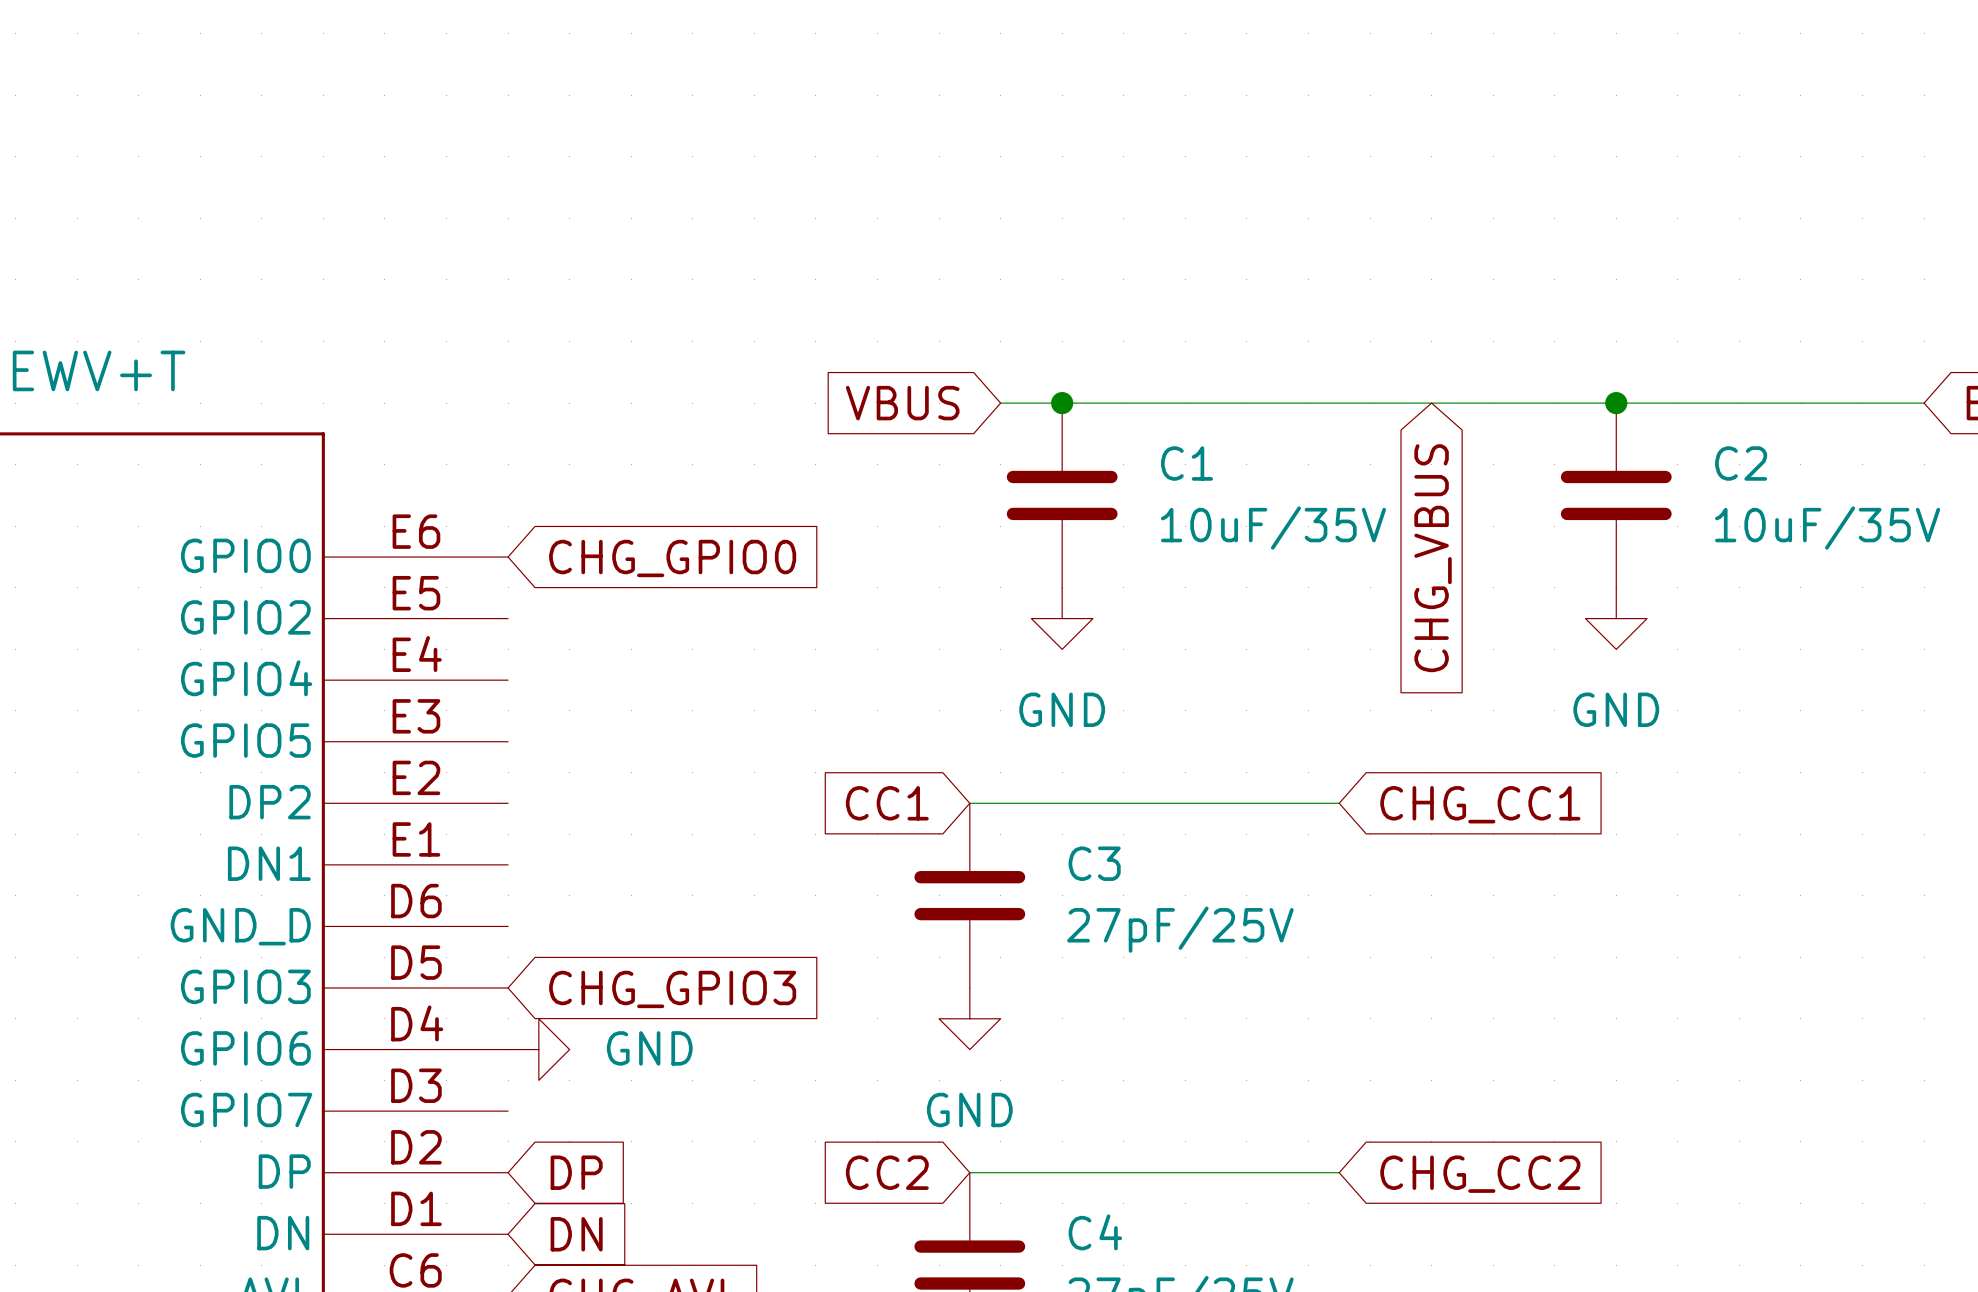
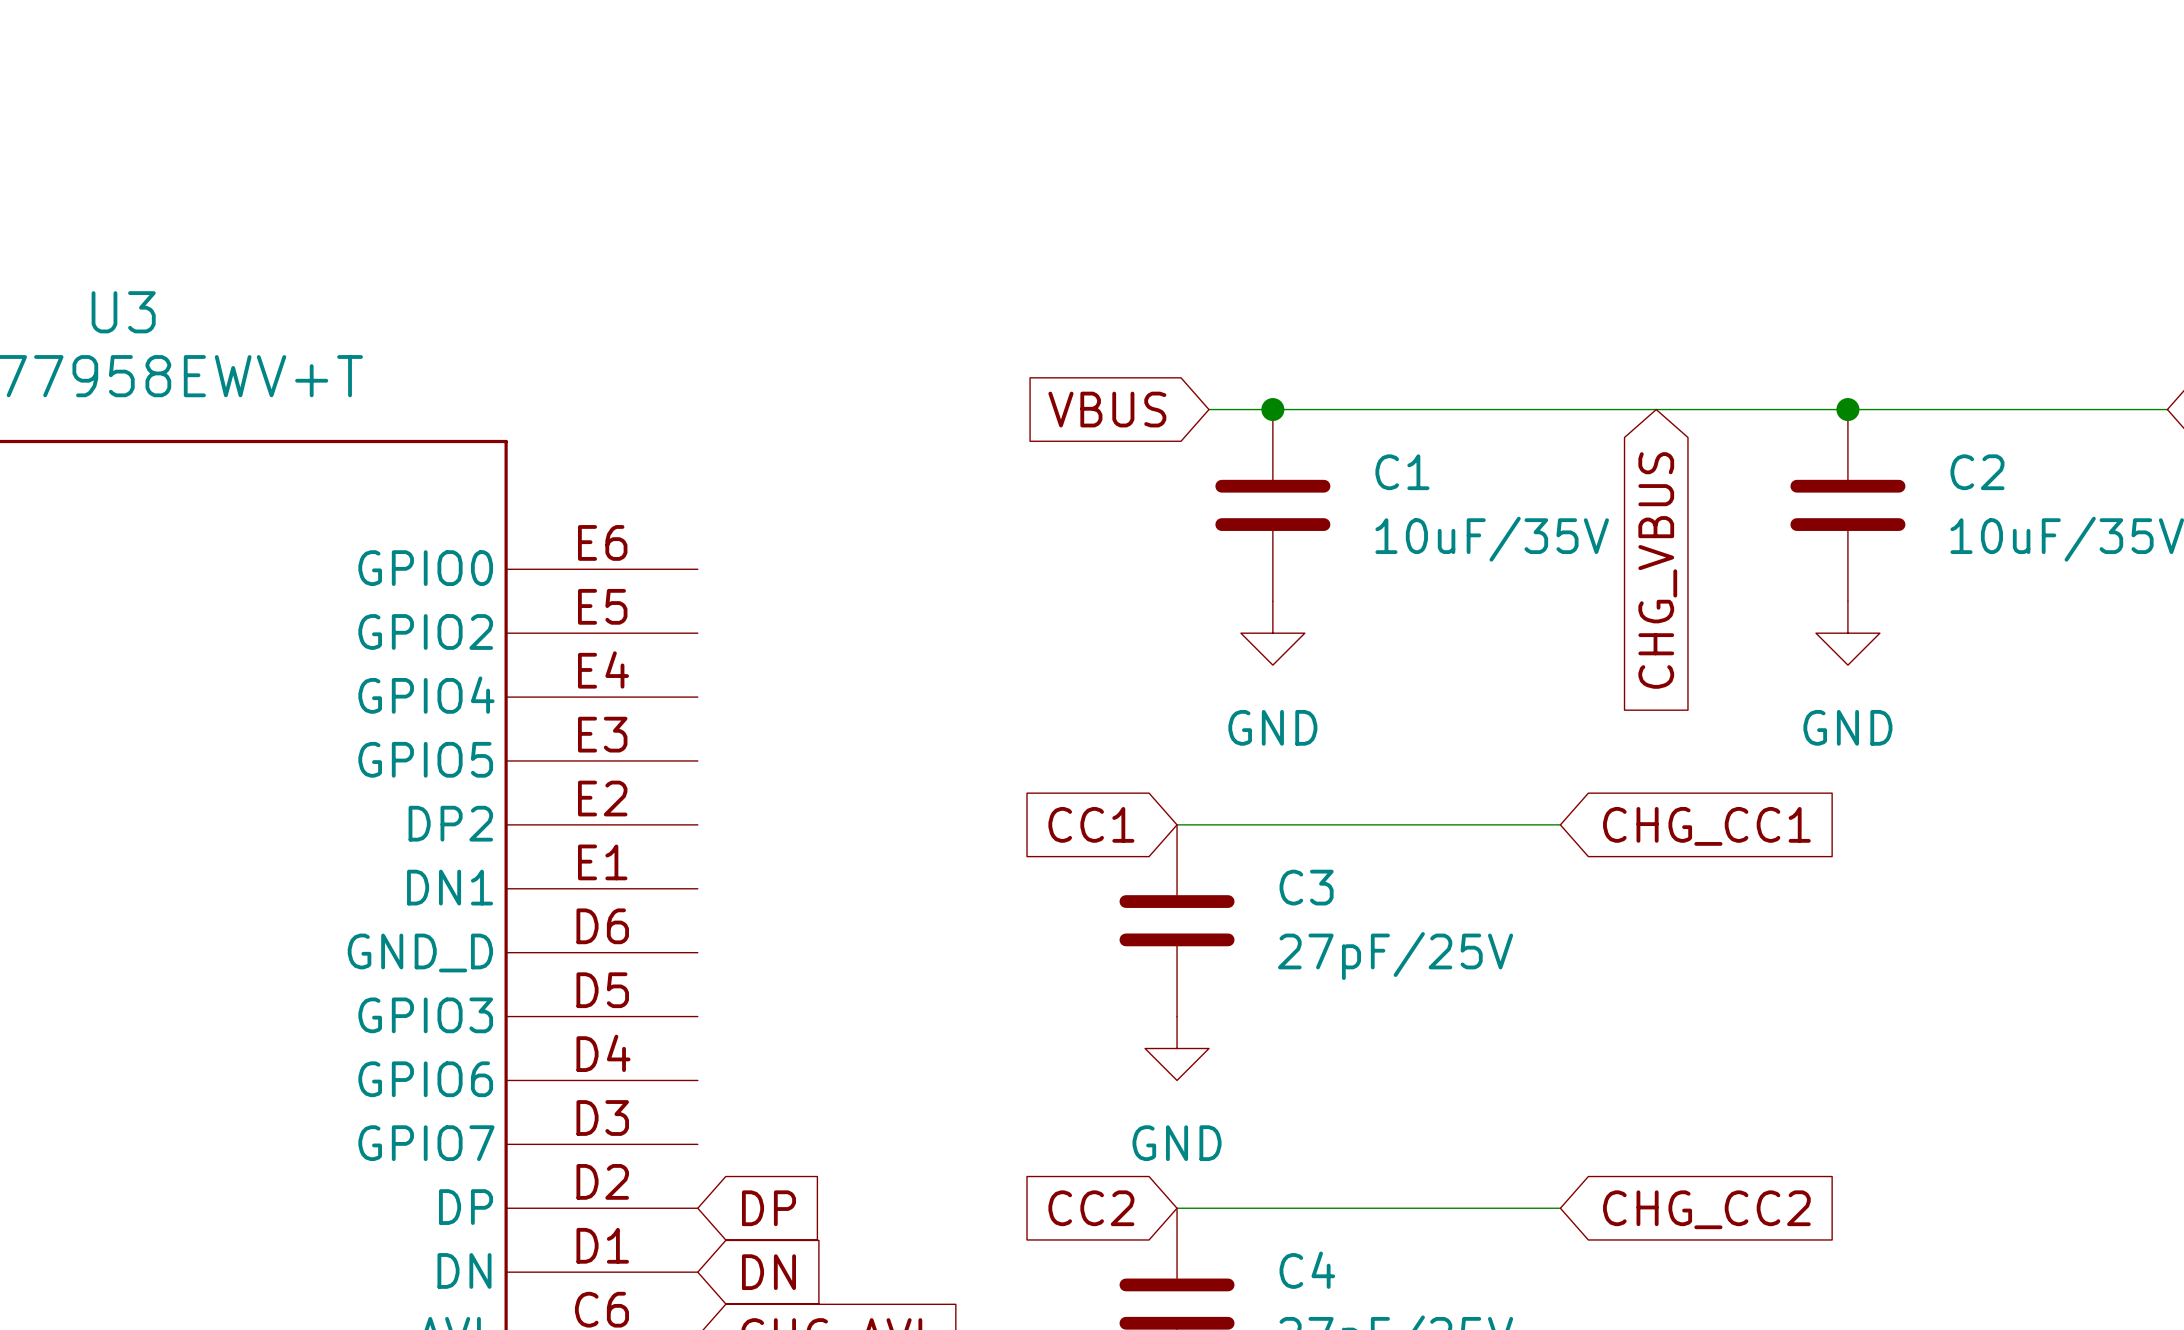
global label: CHG_GPIO0 (672, 558) -> none
global label: CHG_GPIO3 (672, 989) -> none
power symbol: GND (538, 1049) -> none

